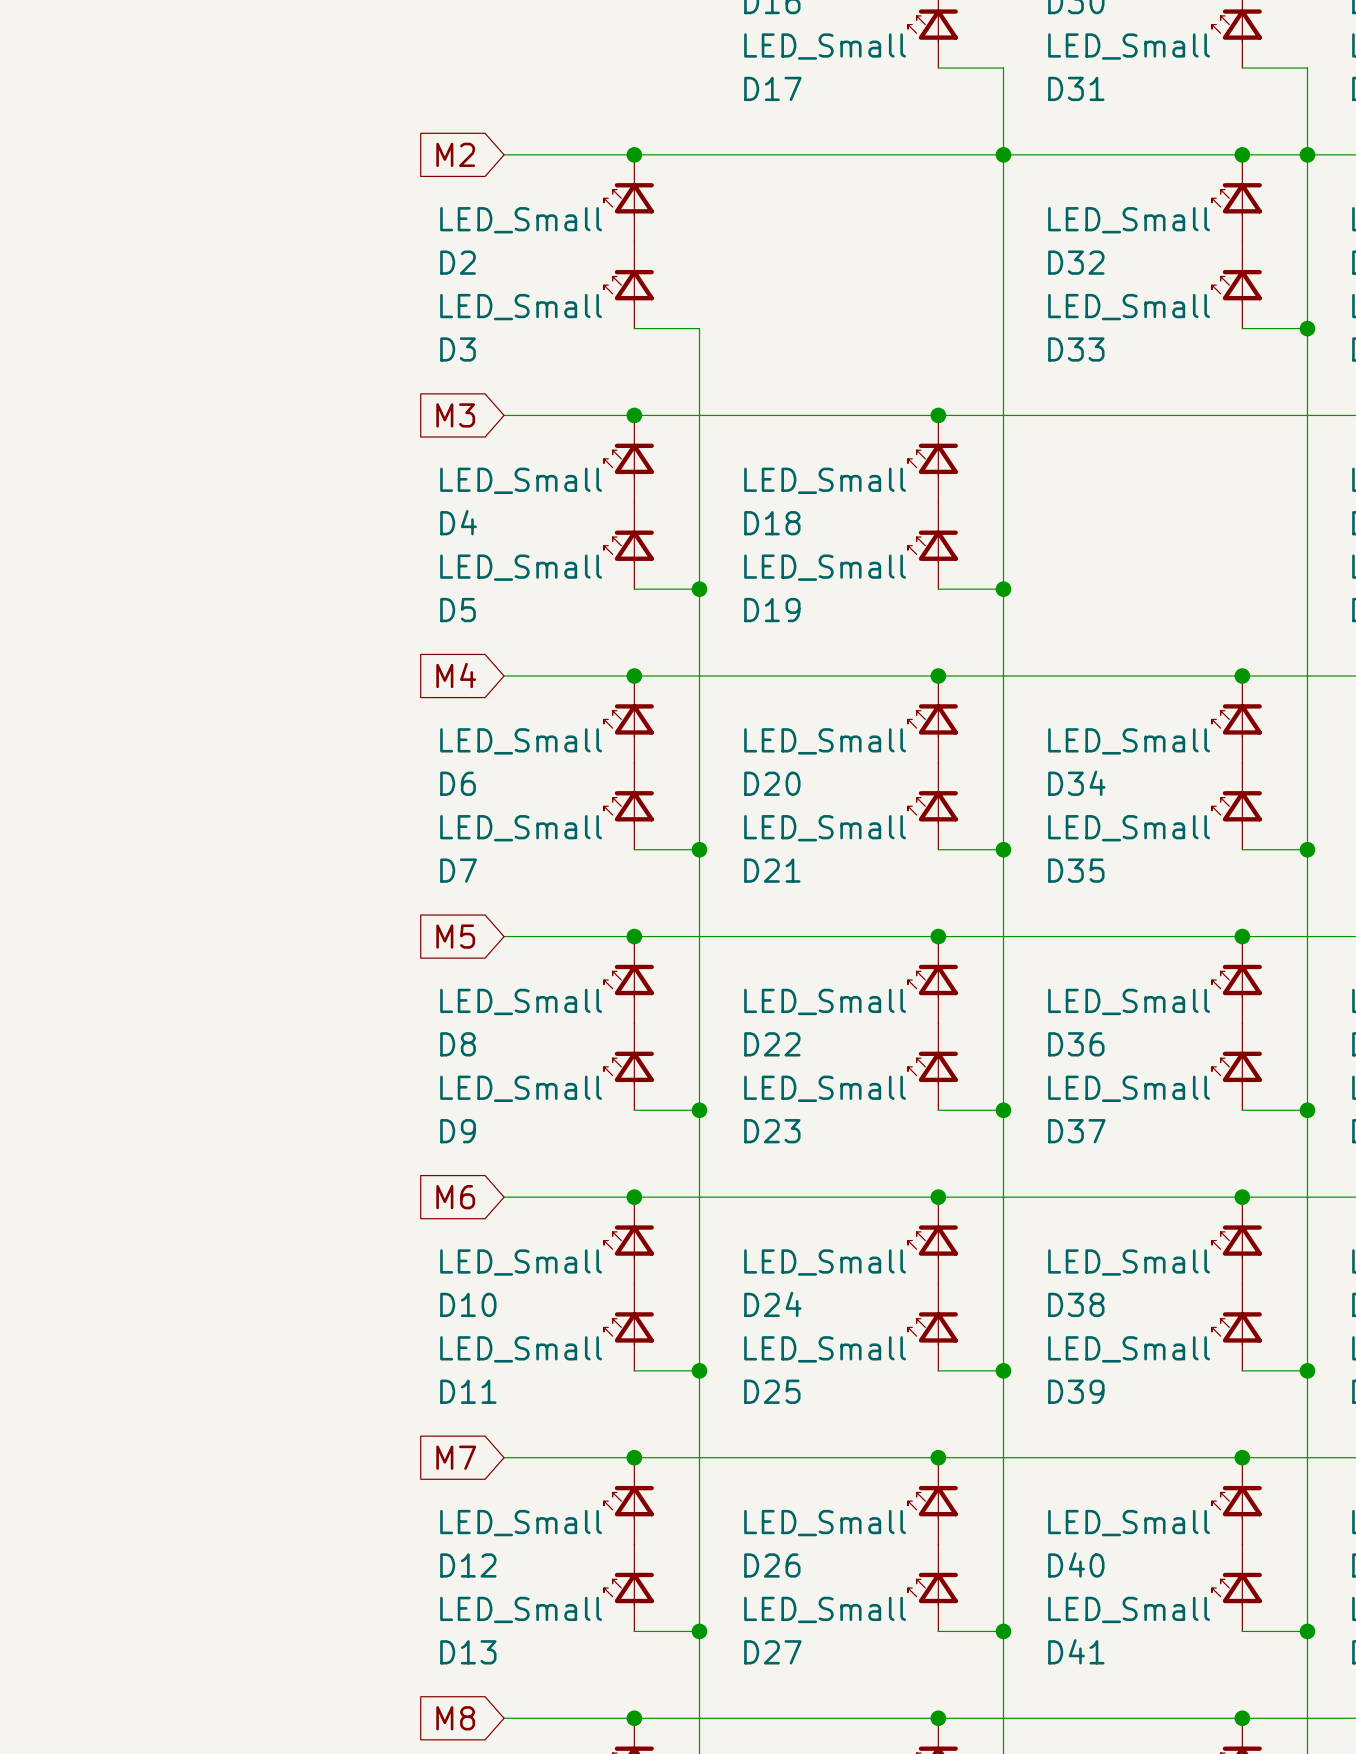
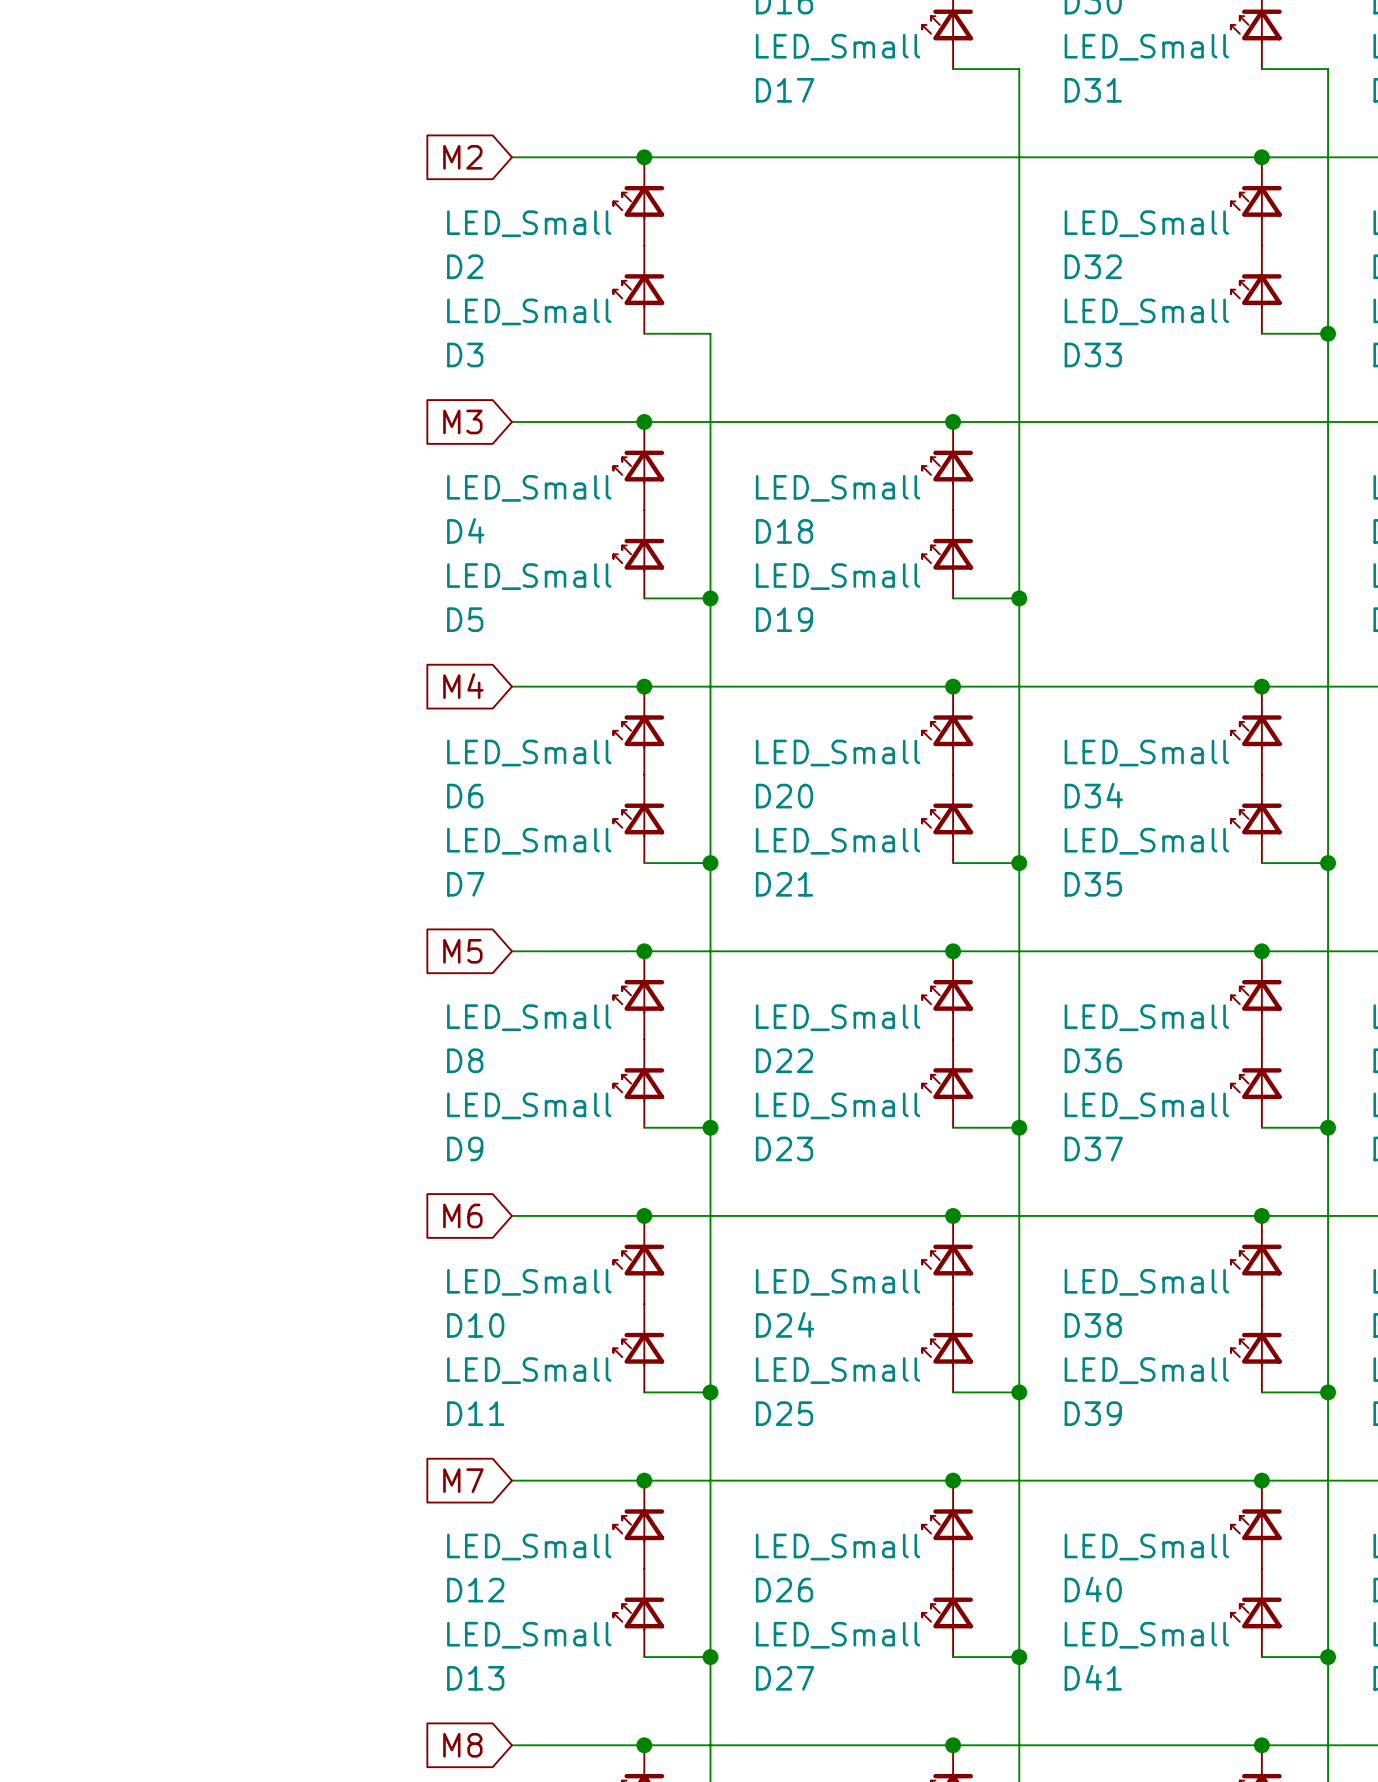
junction: (1003, 154) -> none
junction: (1307, 154) -> none

